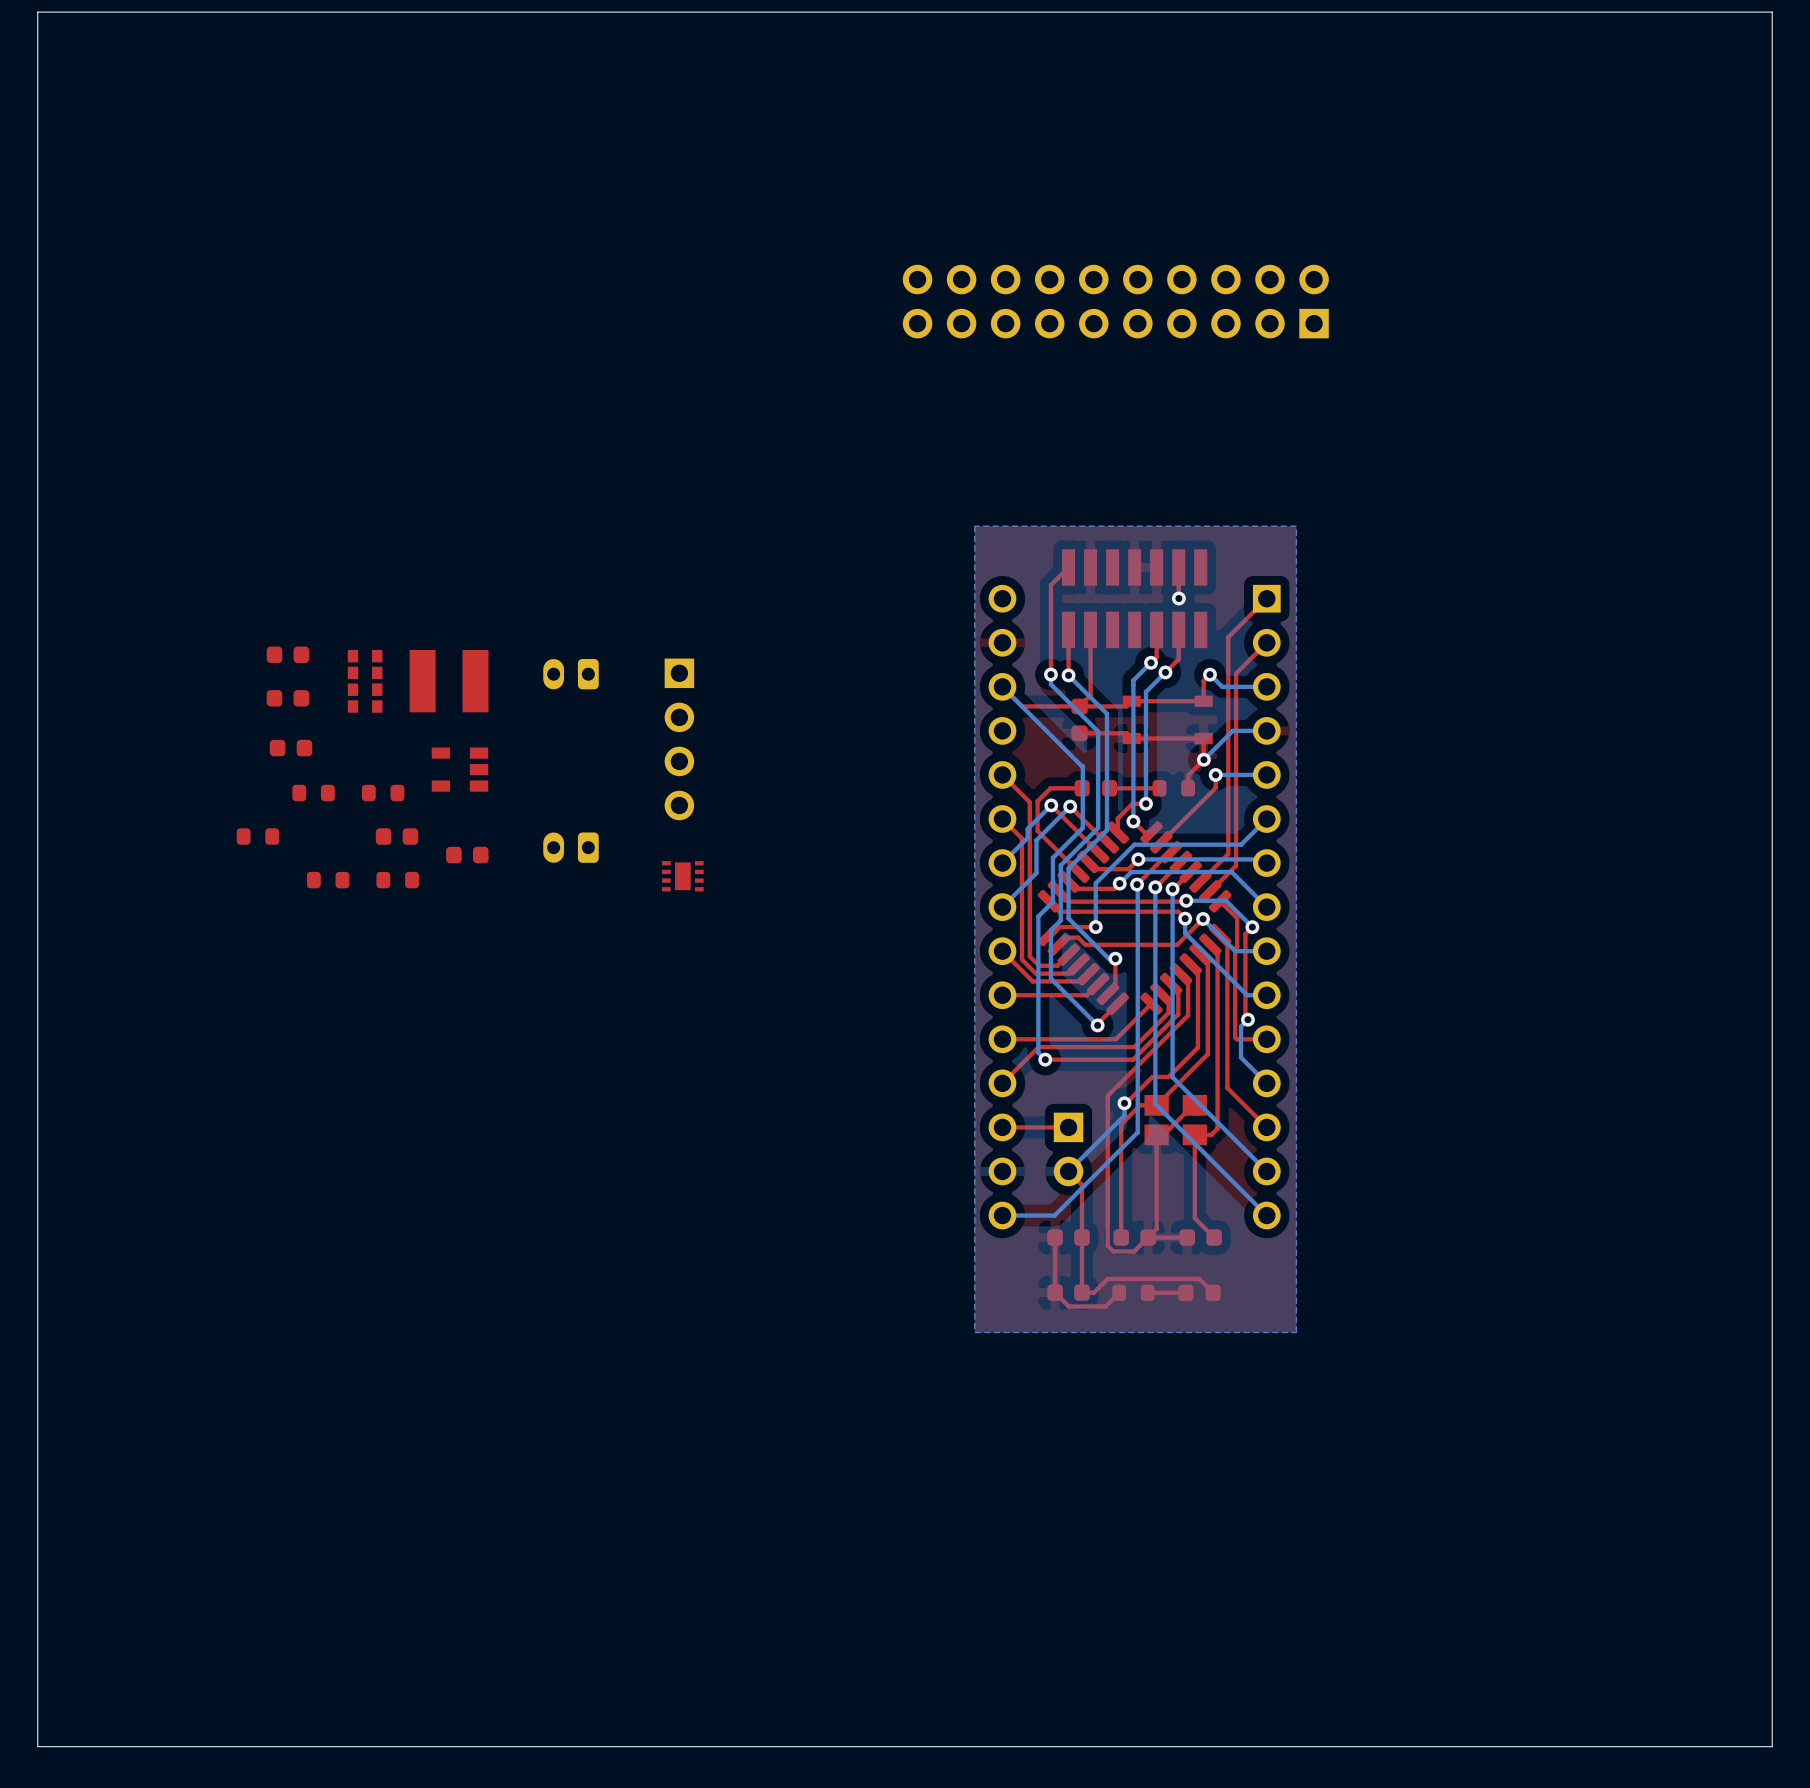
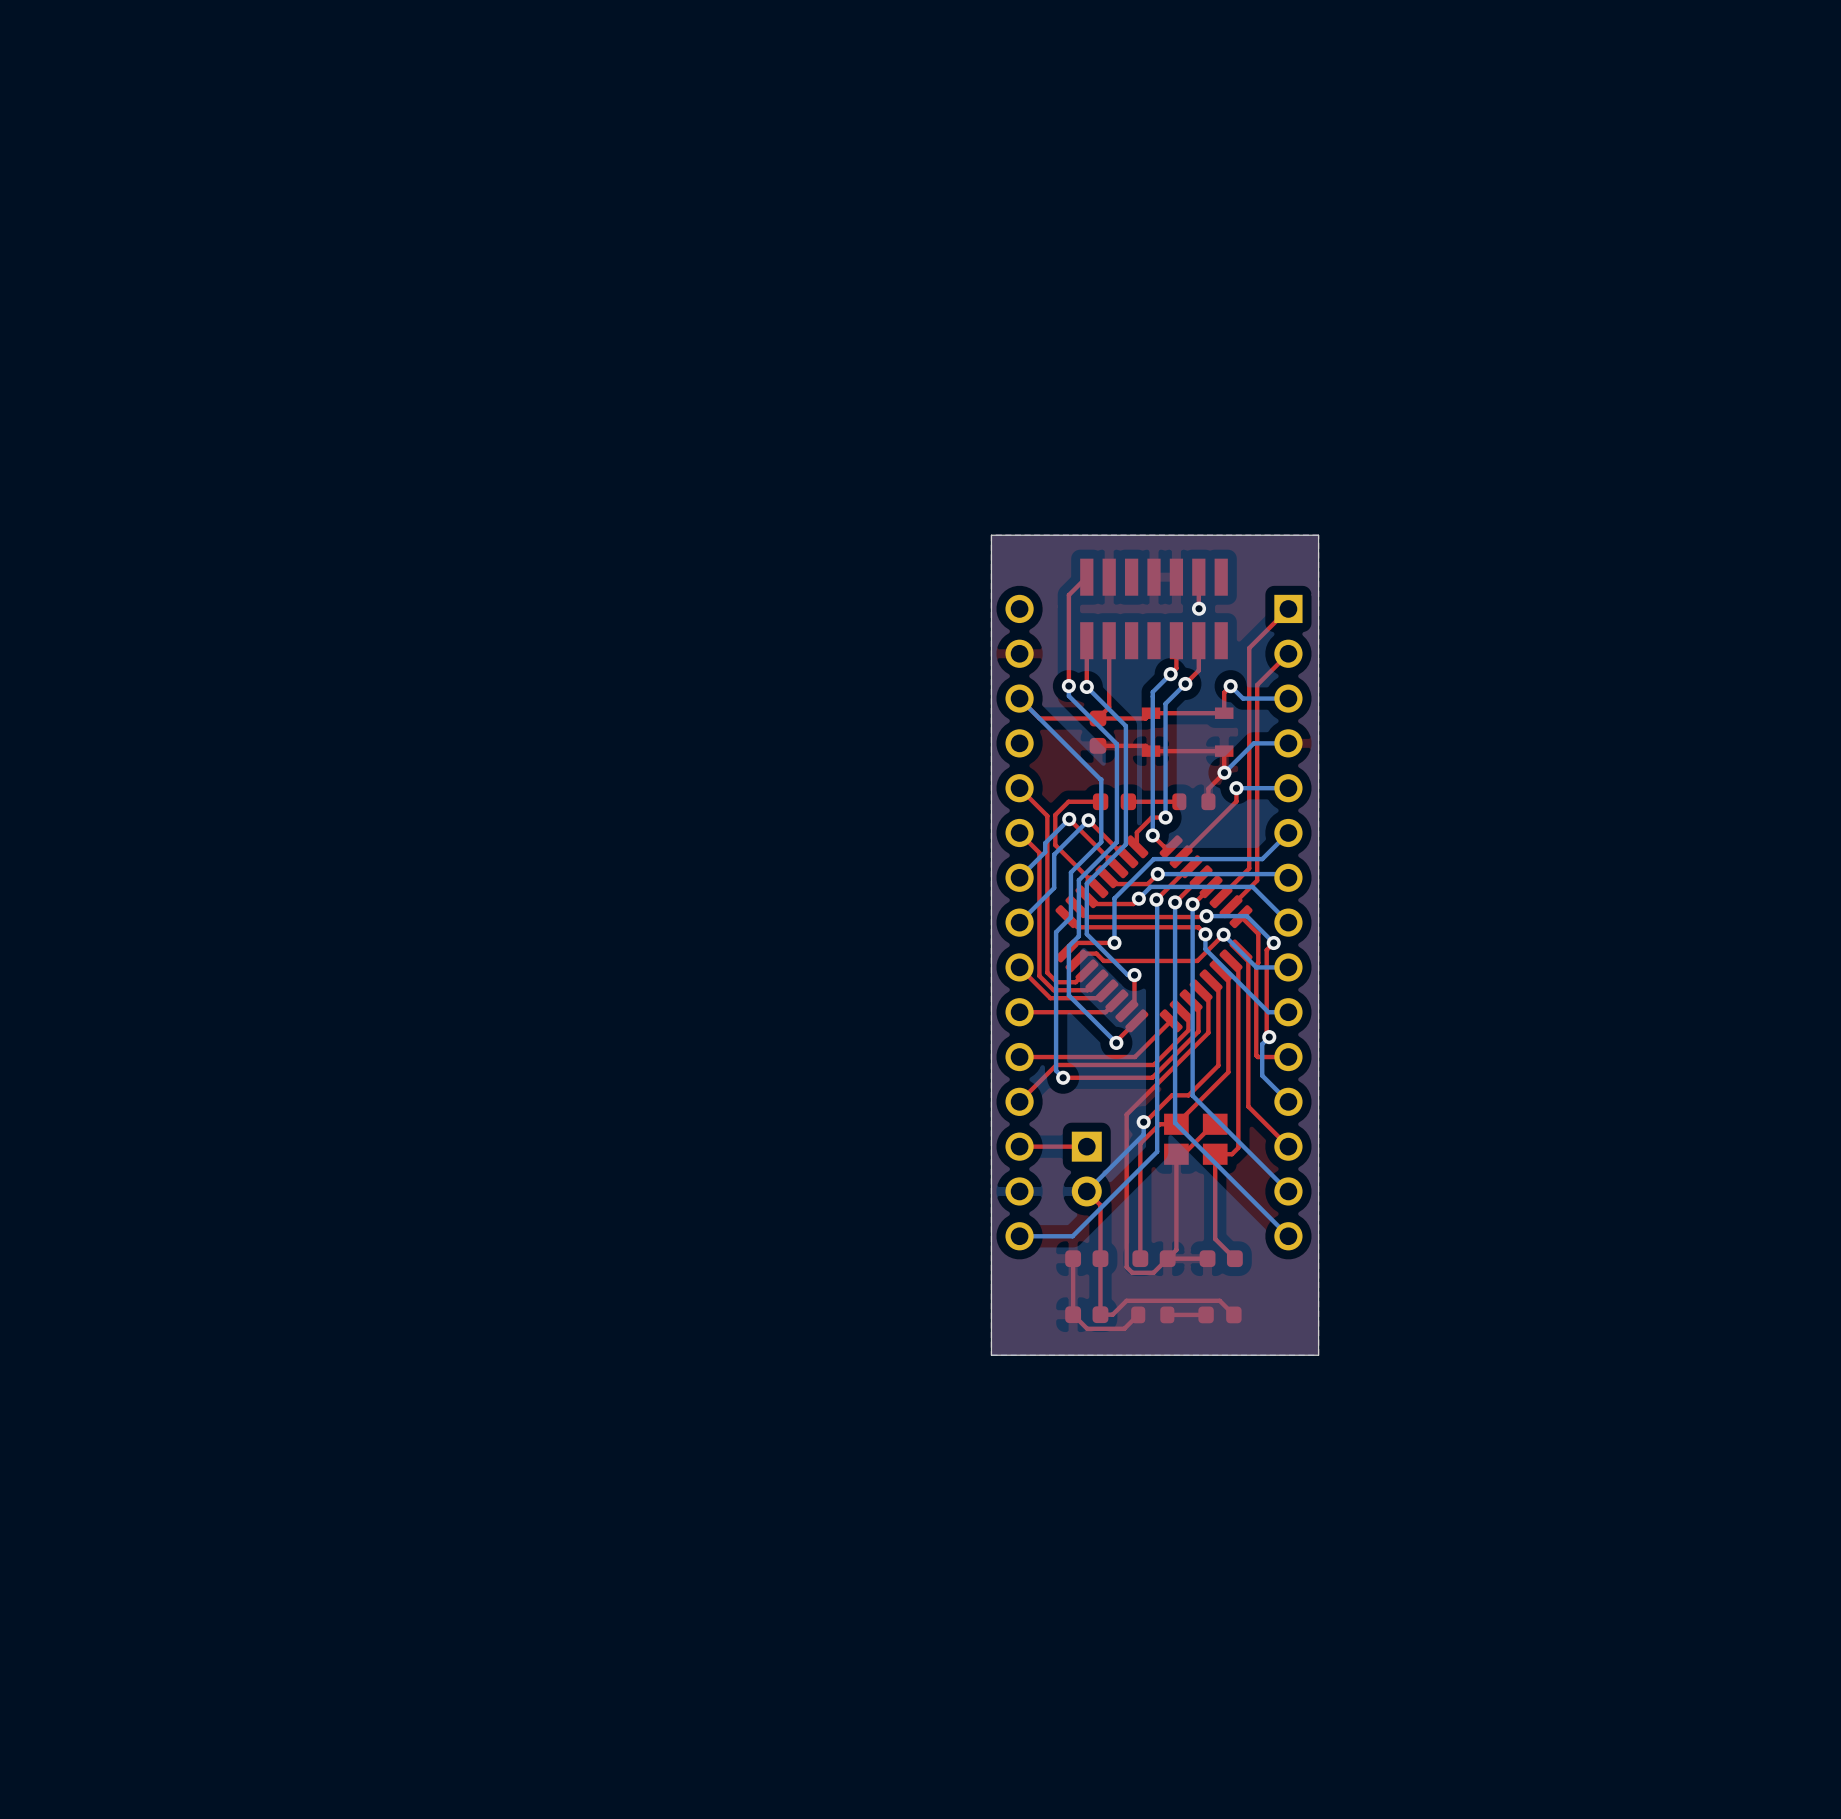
board edge: (1772, 12) (37, 12) (37, 1746) (1772, 1746) (1772, 12) -> none
part: (1115, 301) -> none
board edge: none -> (1318, 535) (1318, 1355) (991, 1355) (991, 535) (1318, 535)
part: (287, 654) -> none
part: (570, 674) -> none
part: (365, 681) -> none
part: (449, 681) -> none
part: (287, 698) -> none
part: (679, 739) -> none
part: (291, 748) -> none
part: (459, 769) -> none
part: (313, 793) -> none
part: (383, 793) -> none
part: (257, 836) -> none
part: (397, 836) -> none
part: (570, 847) -> none
part: (467, 855) -> none
part: (682, 876) -> none
part: (328, 880) -> none
part: (397, 880) -> none

